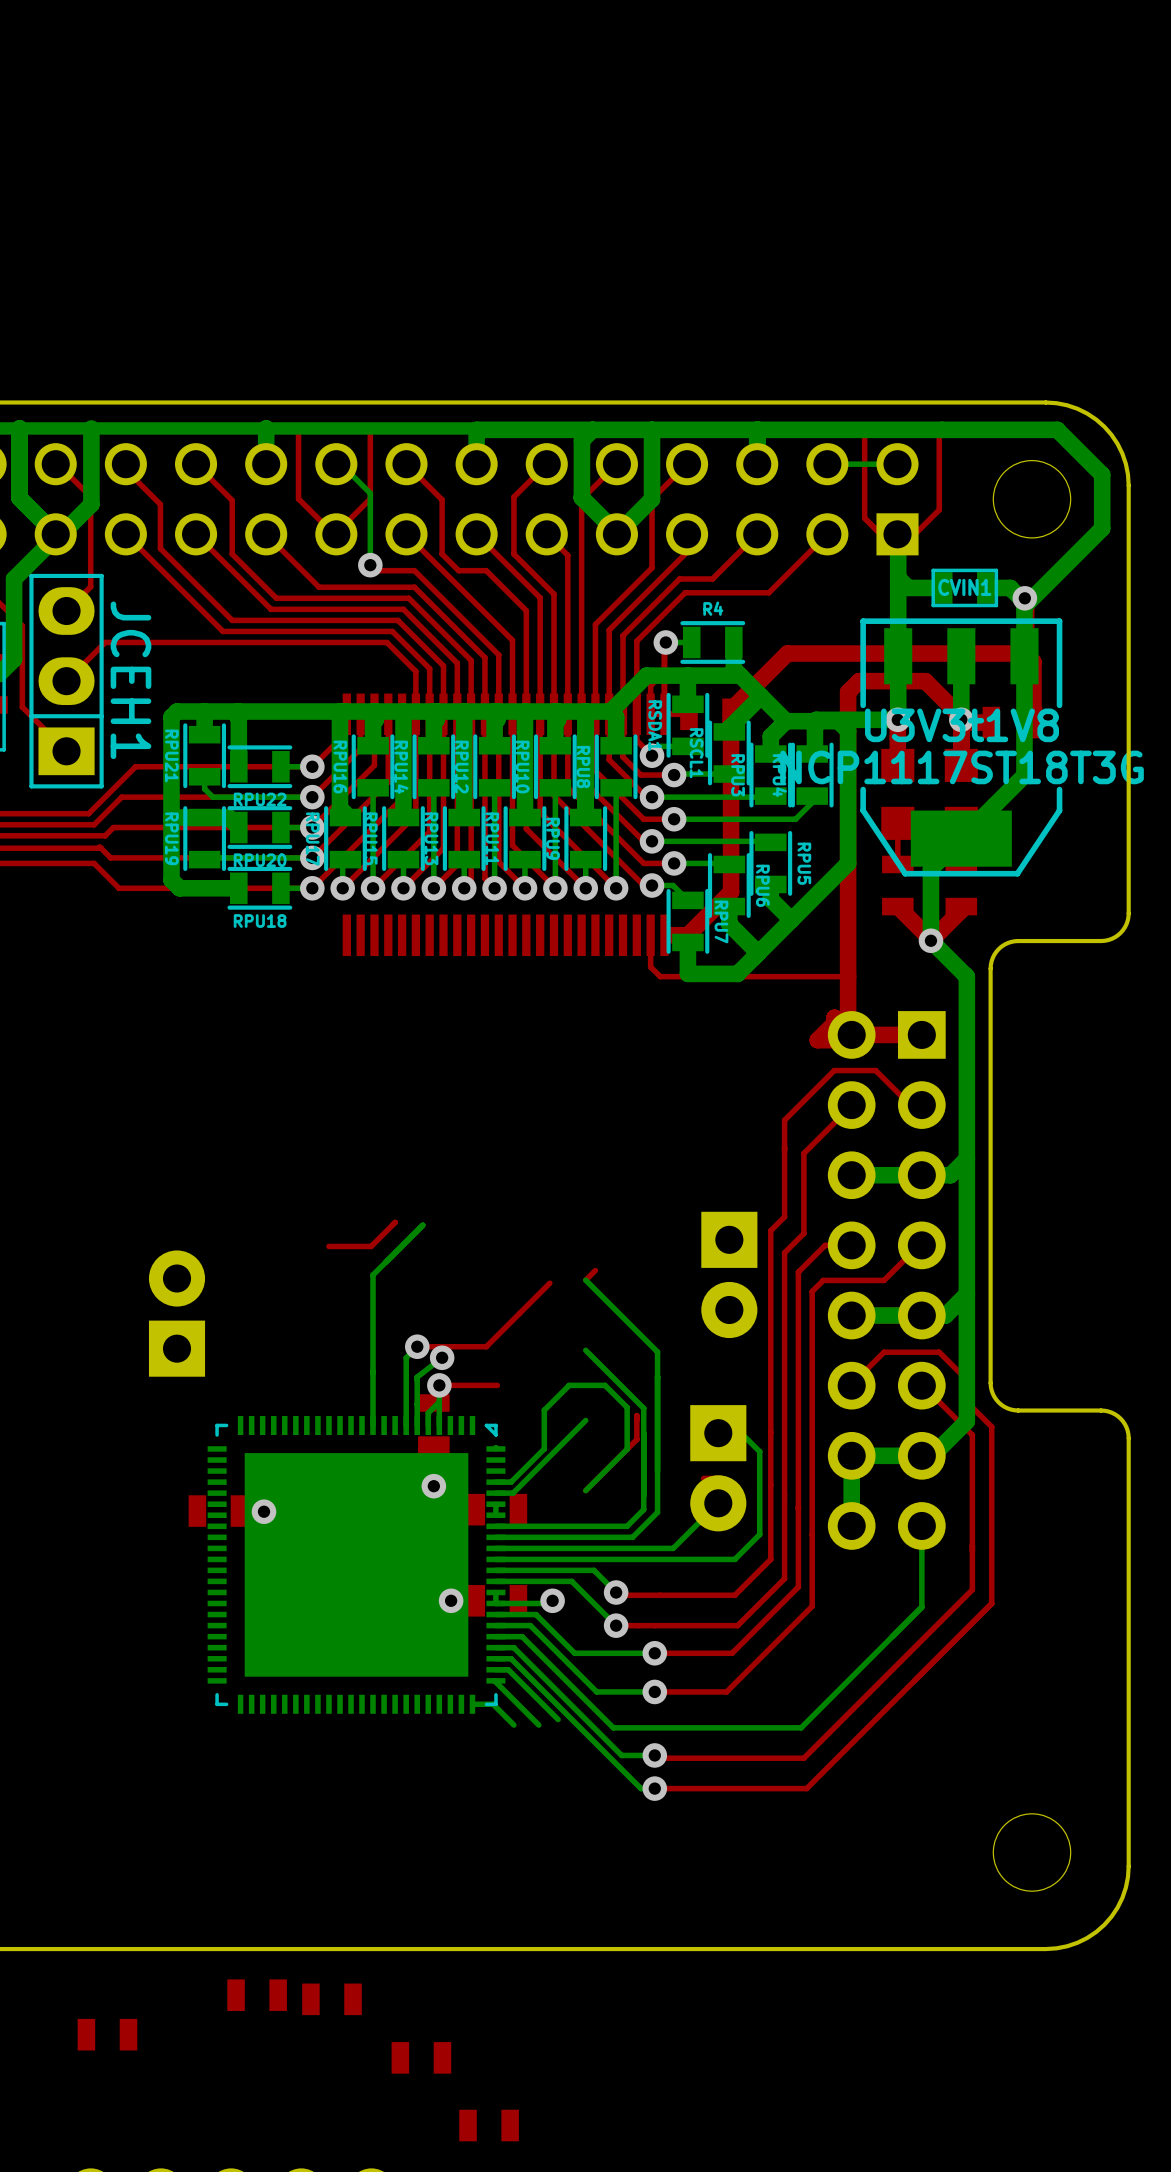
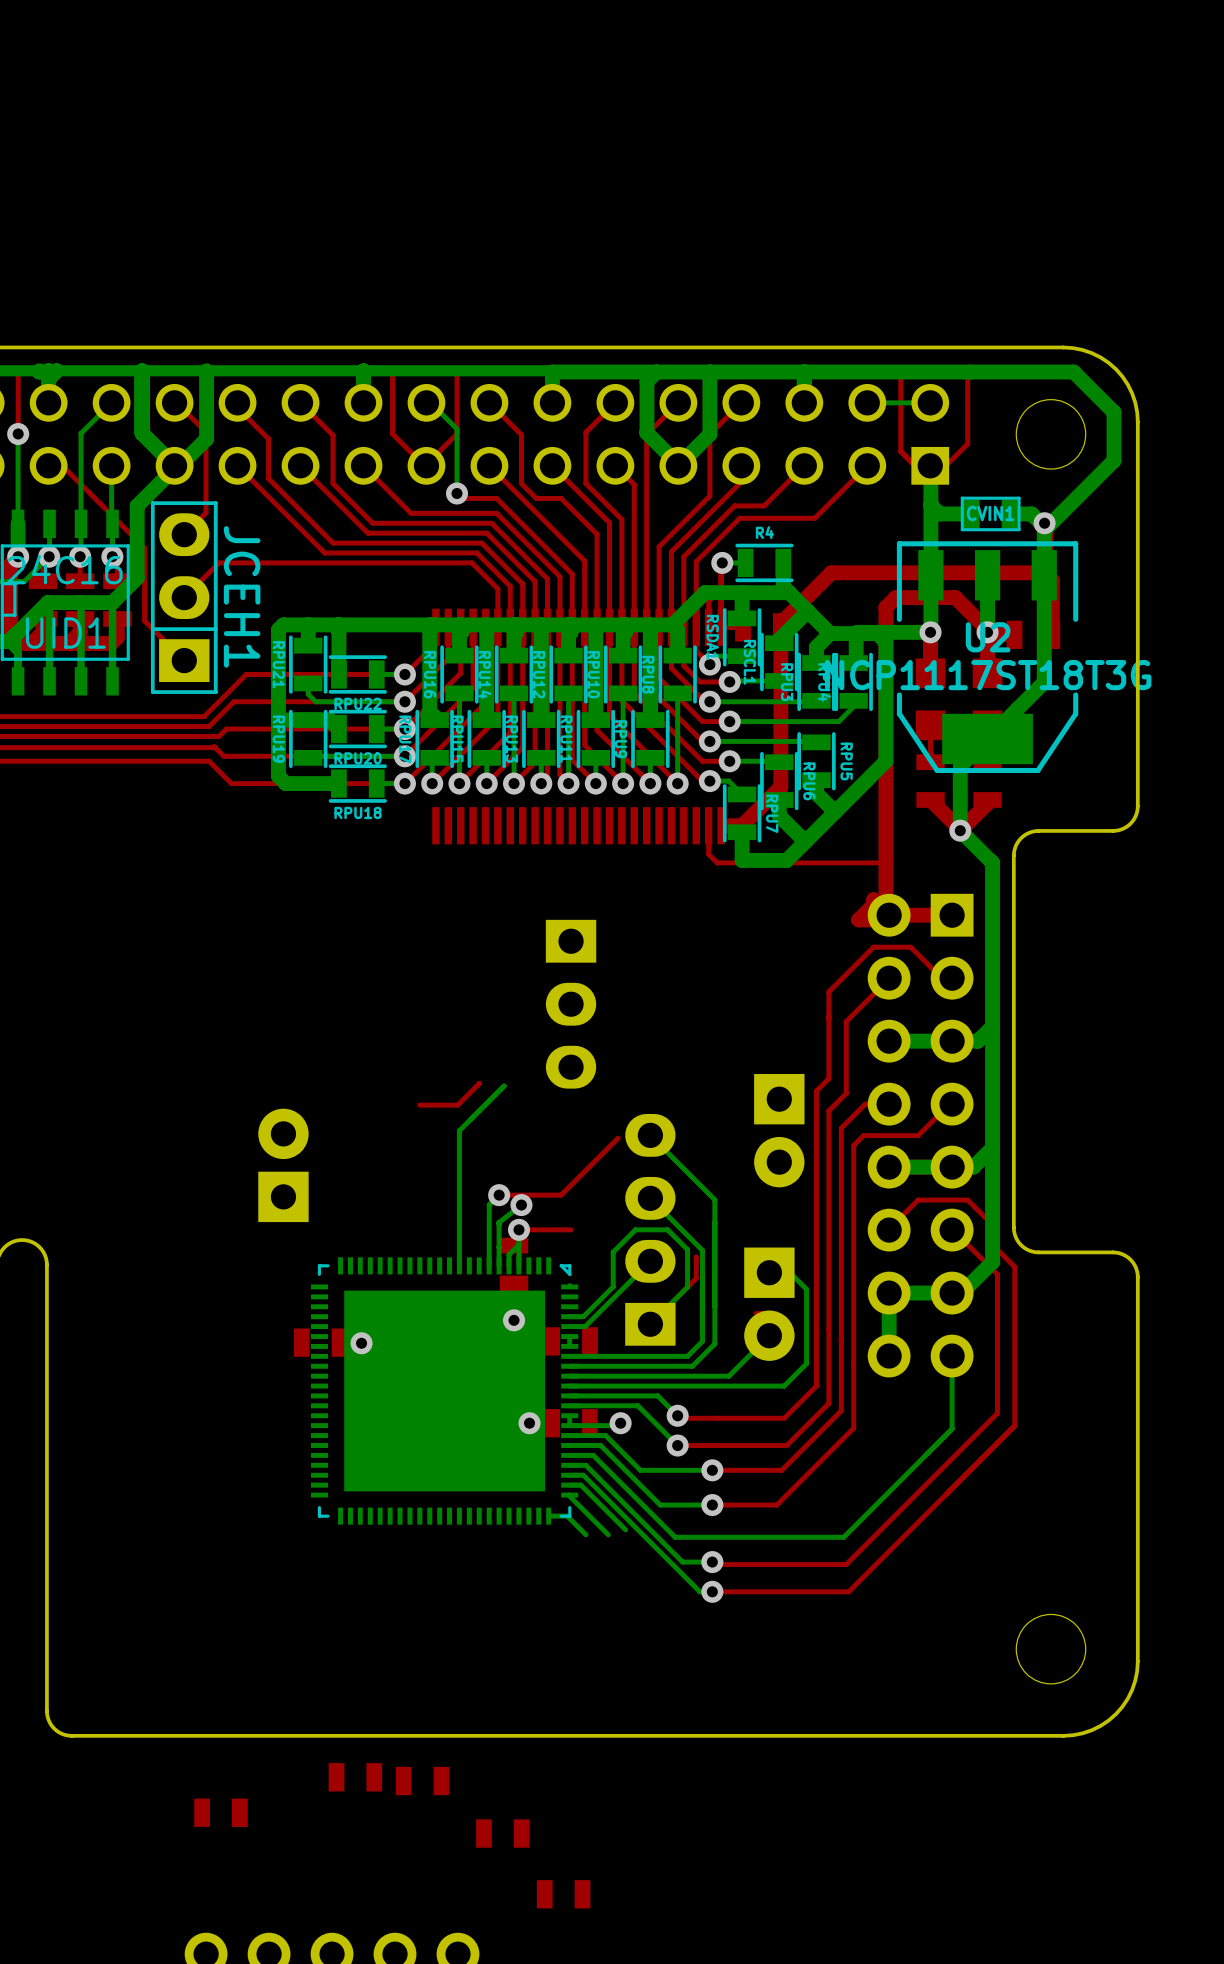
U3V3t1V8 name: U3V3t1V8 (962, 725) -> U2 (988, 637)
part: none -> (571, 1004)
part: none -> (650, 1229)

